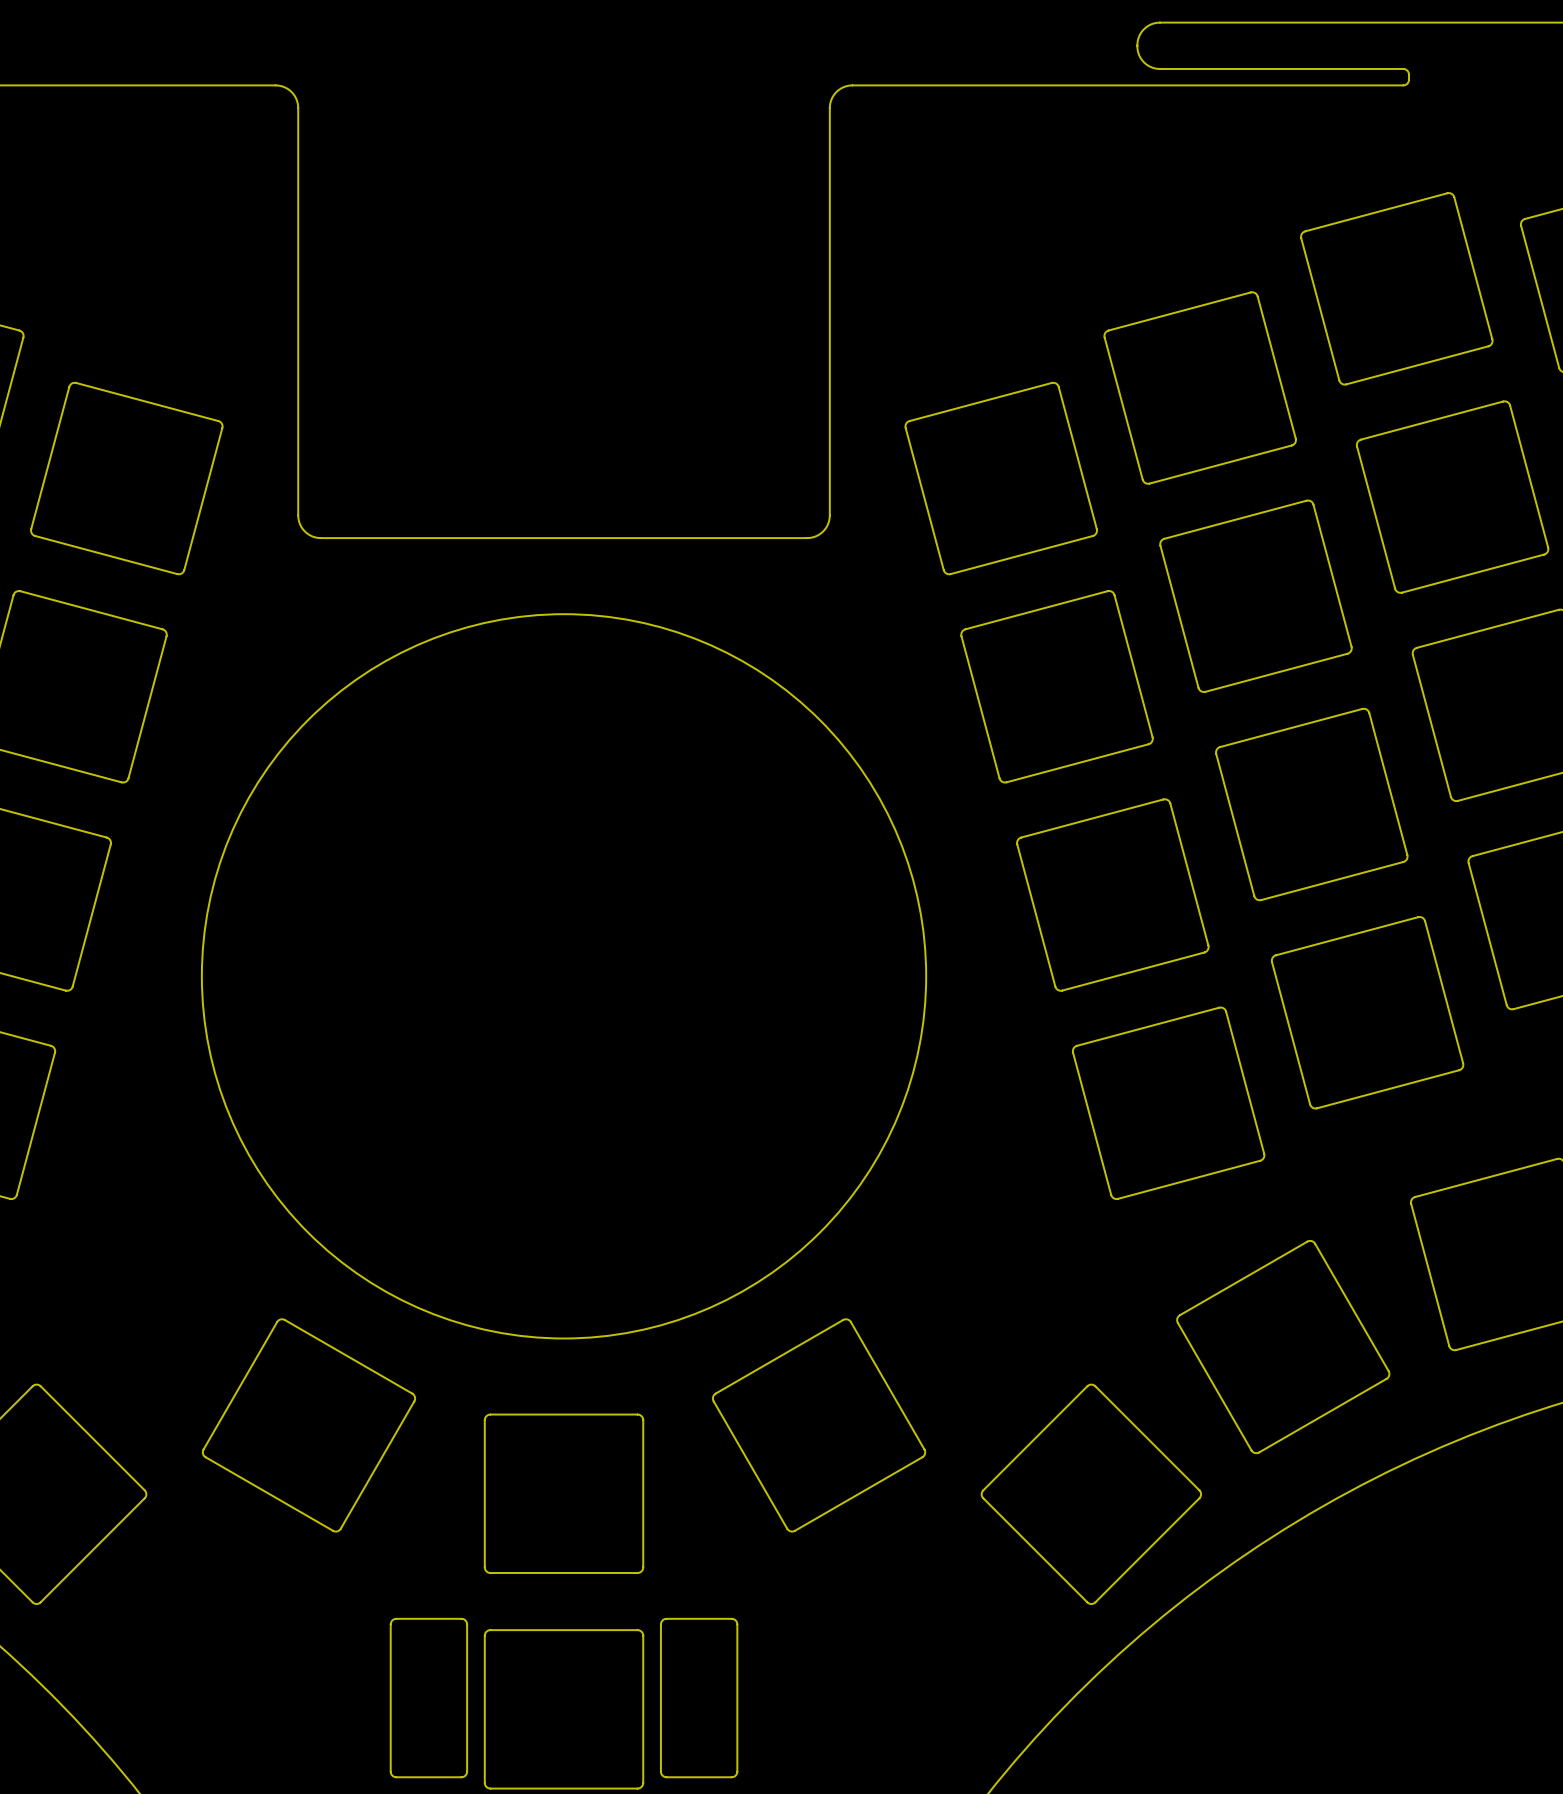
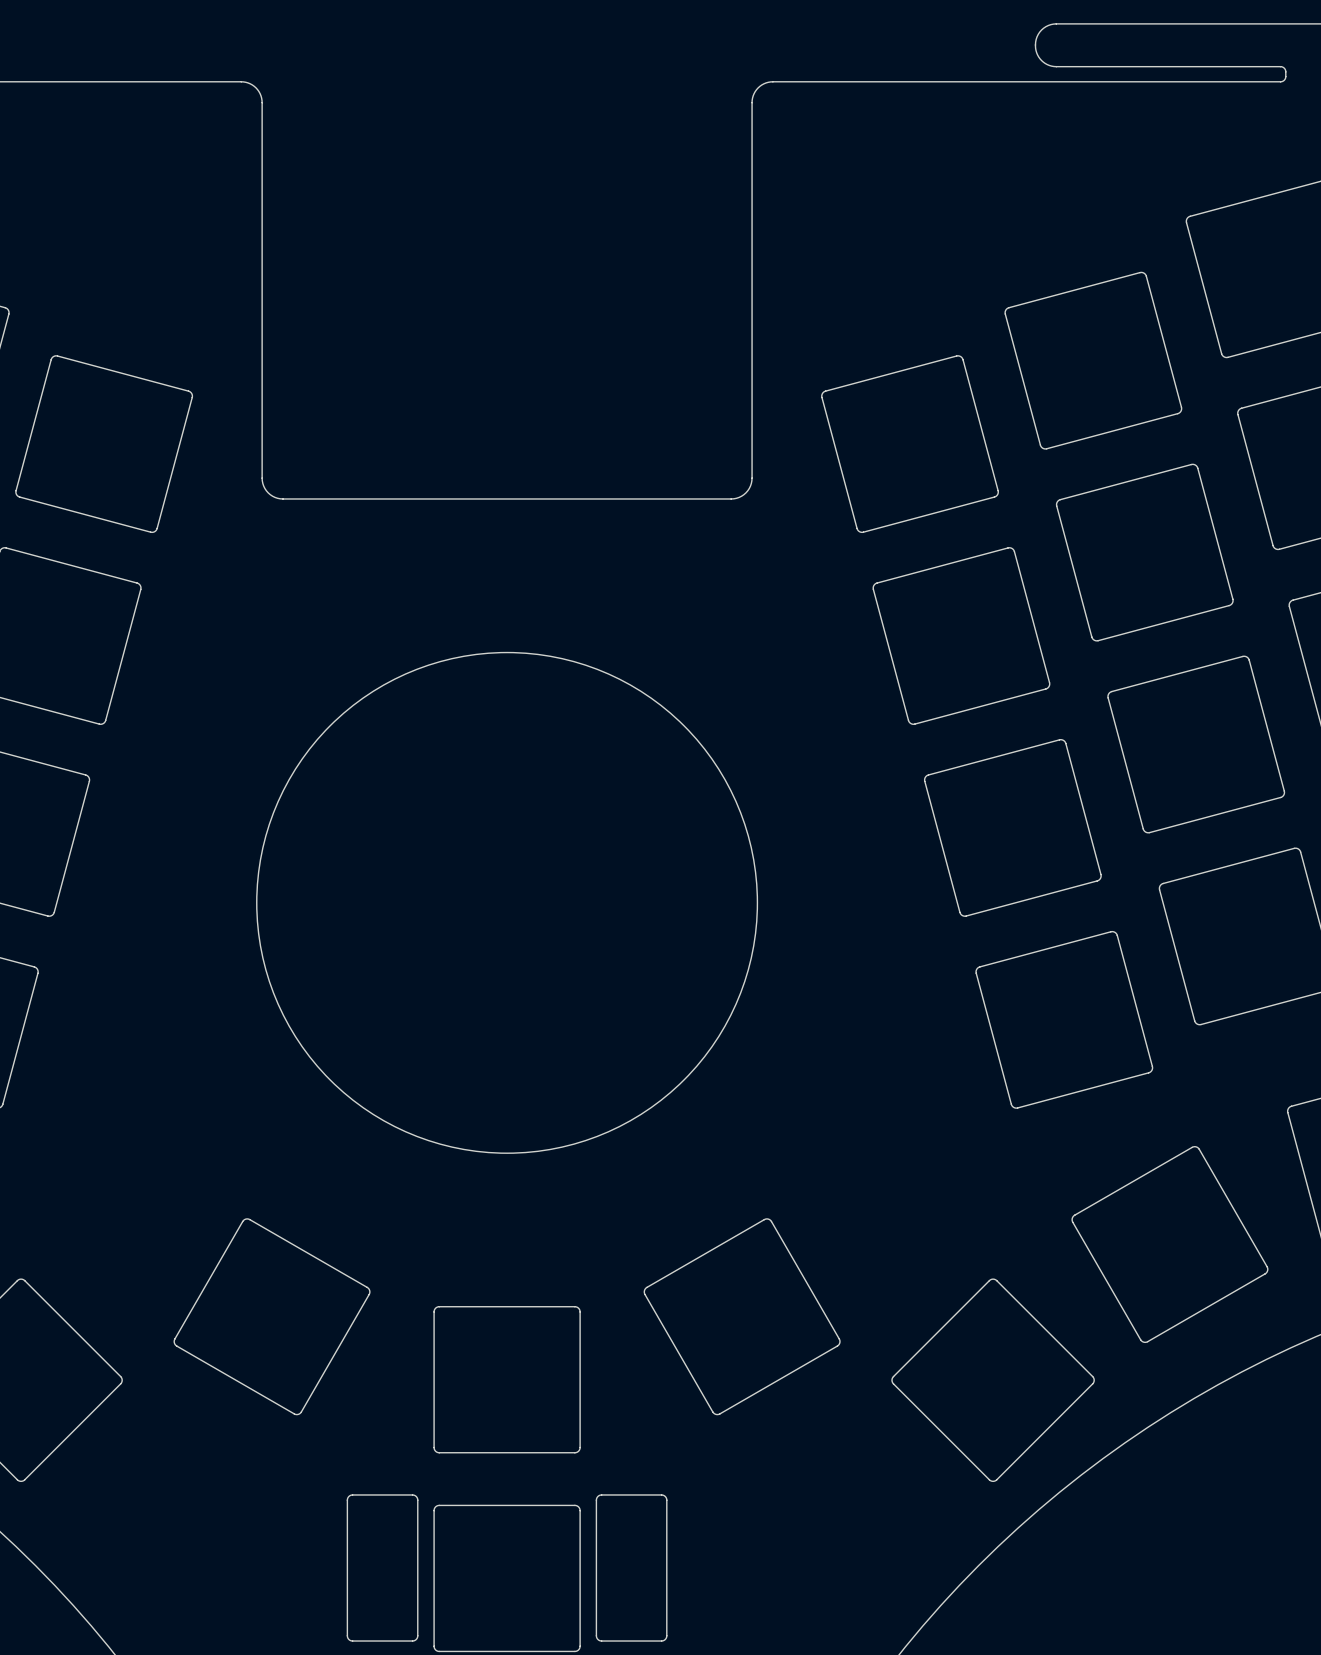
round board edge size: [201, 613, 927, 1340] -> [256, 652, 758, 1154]

